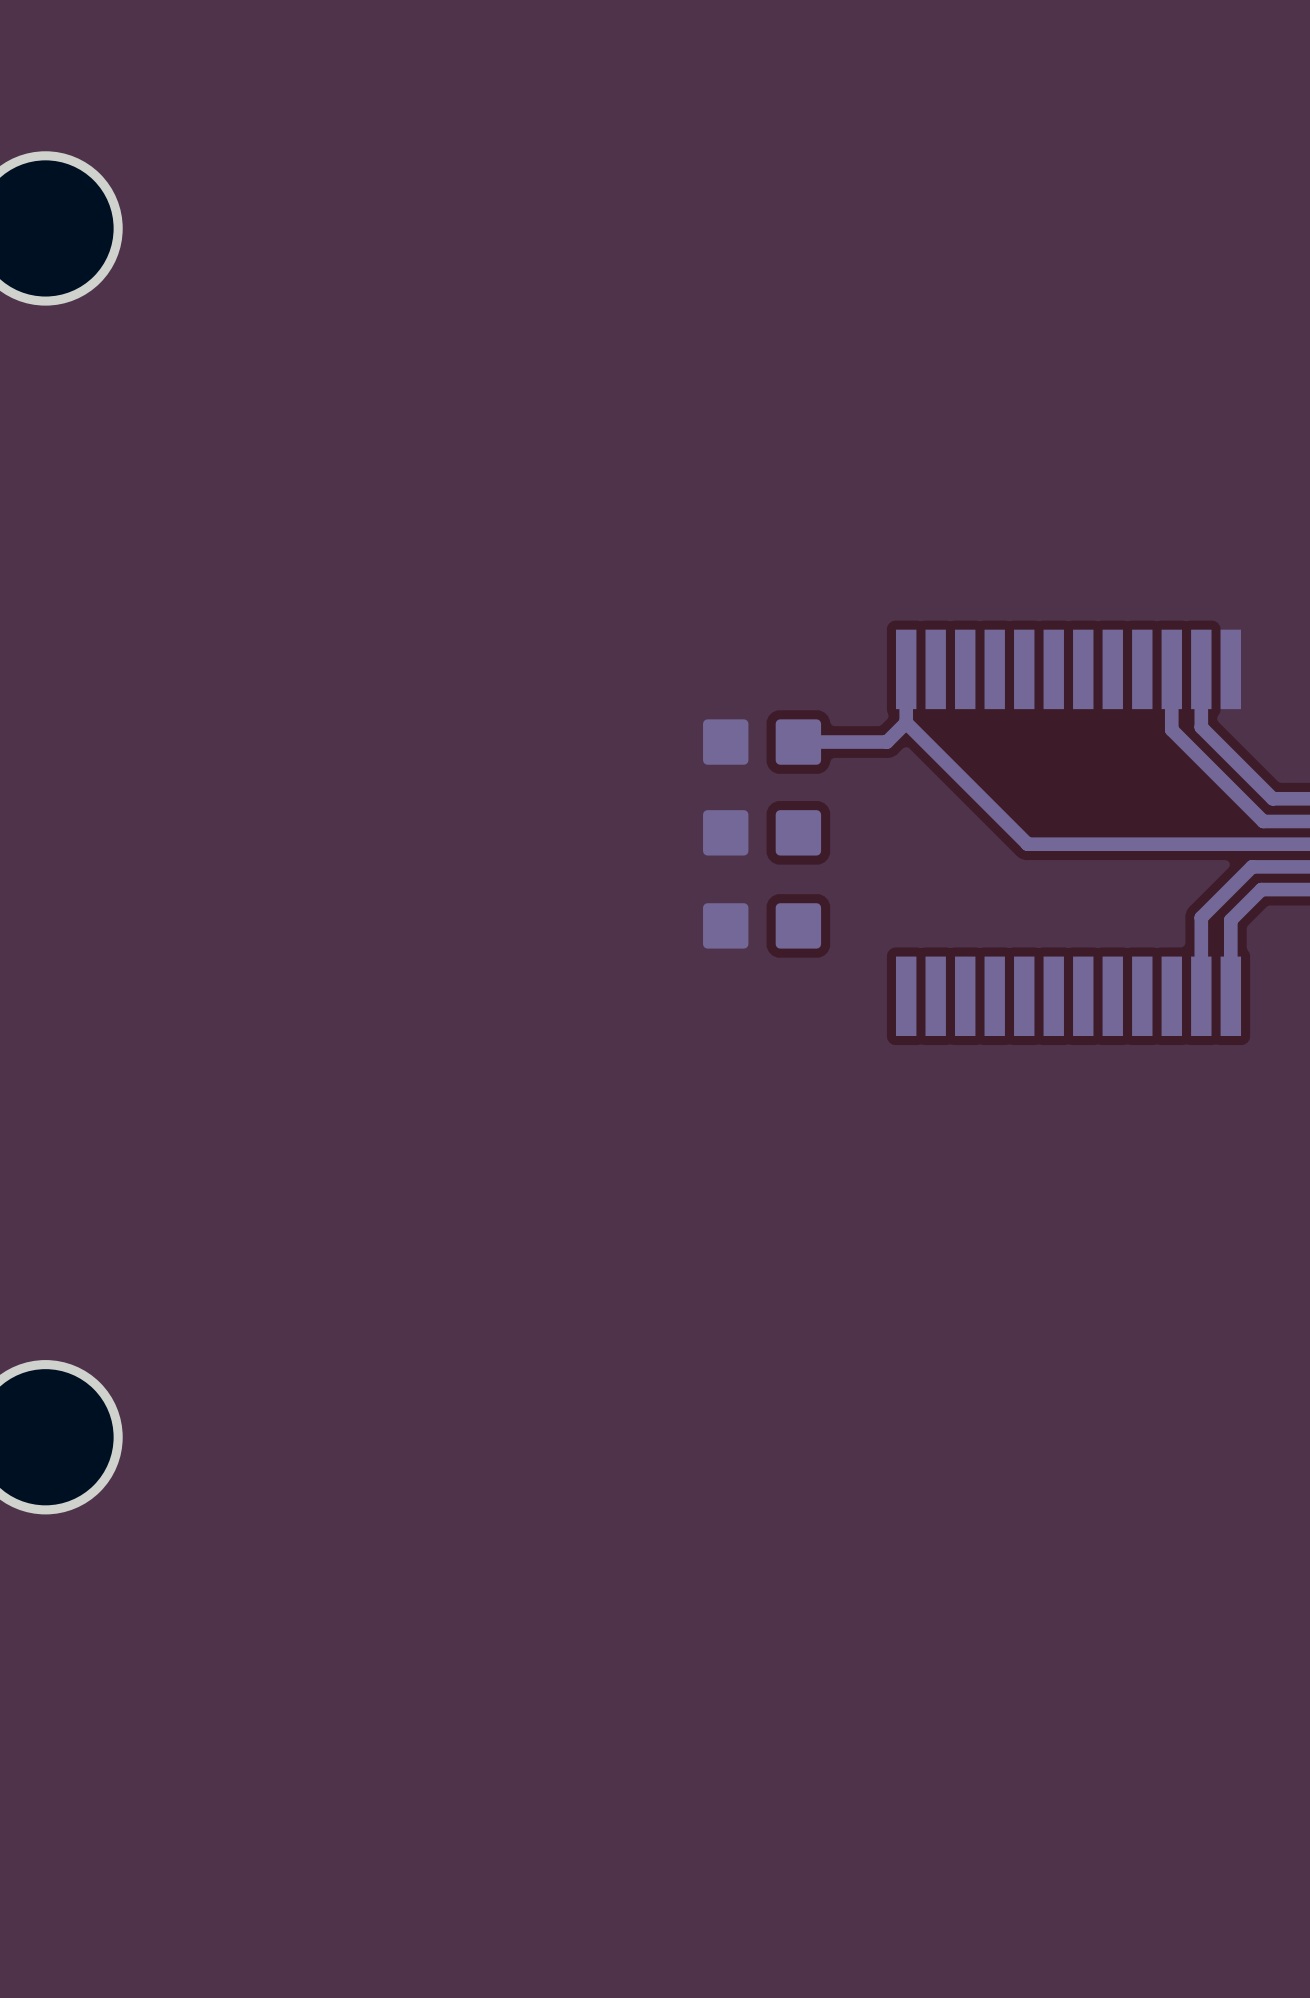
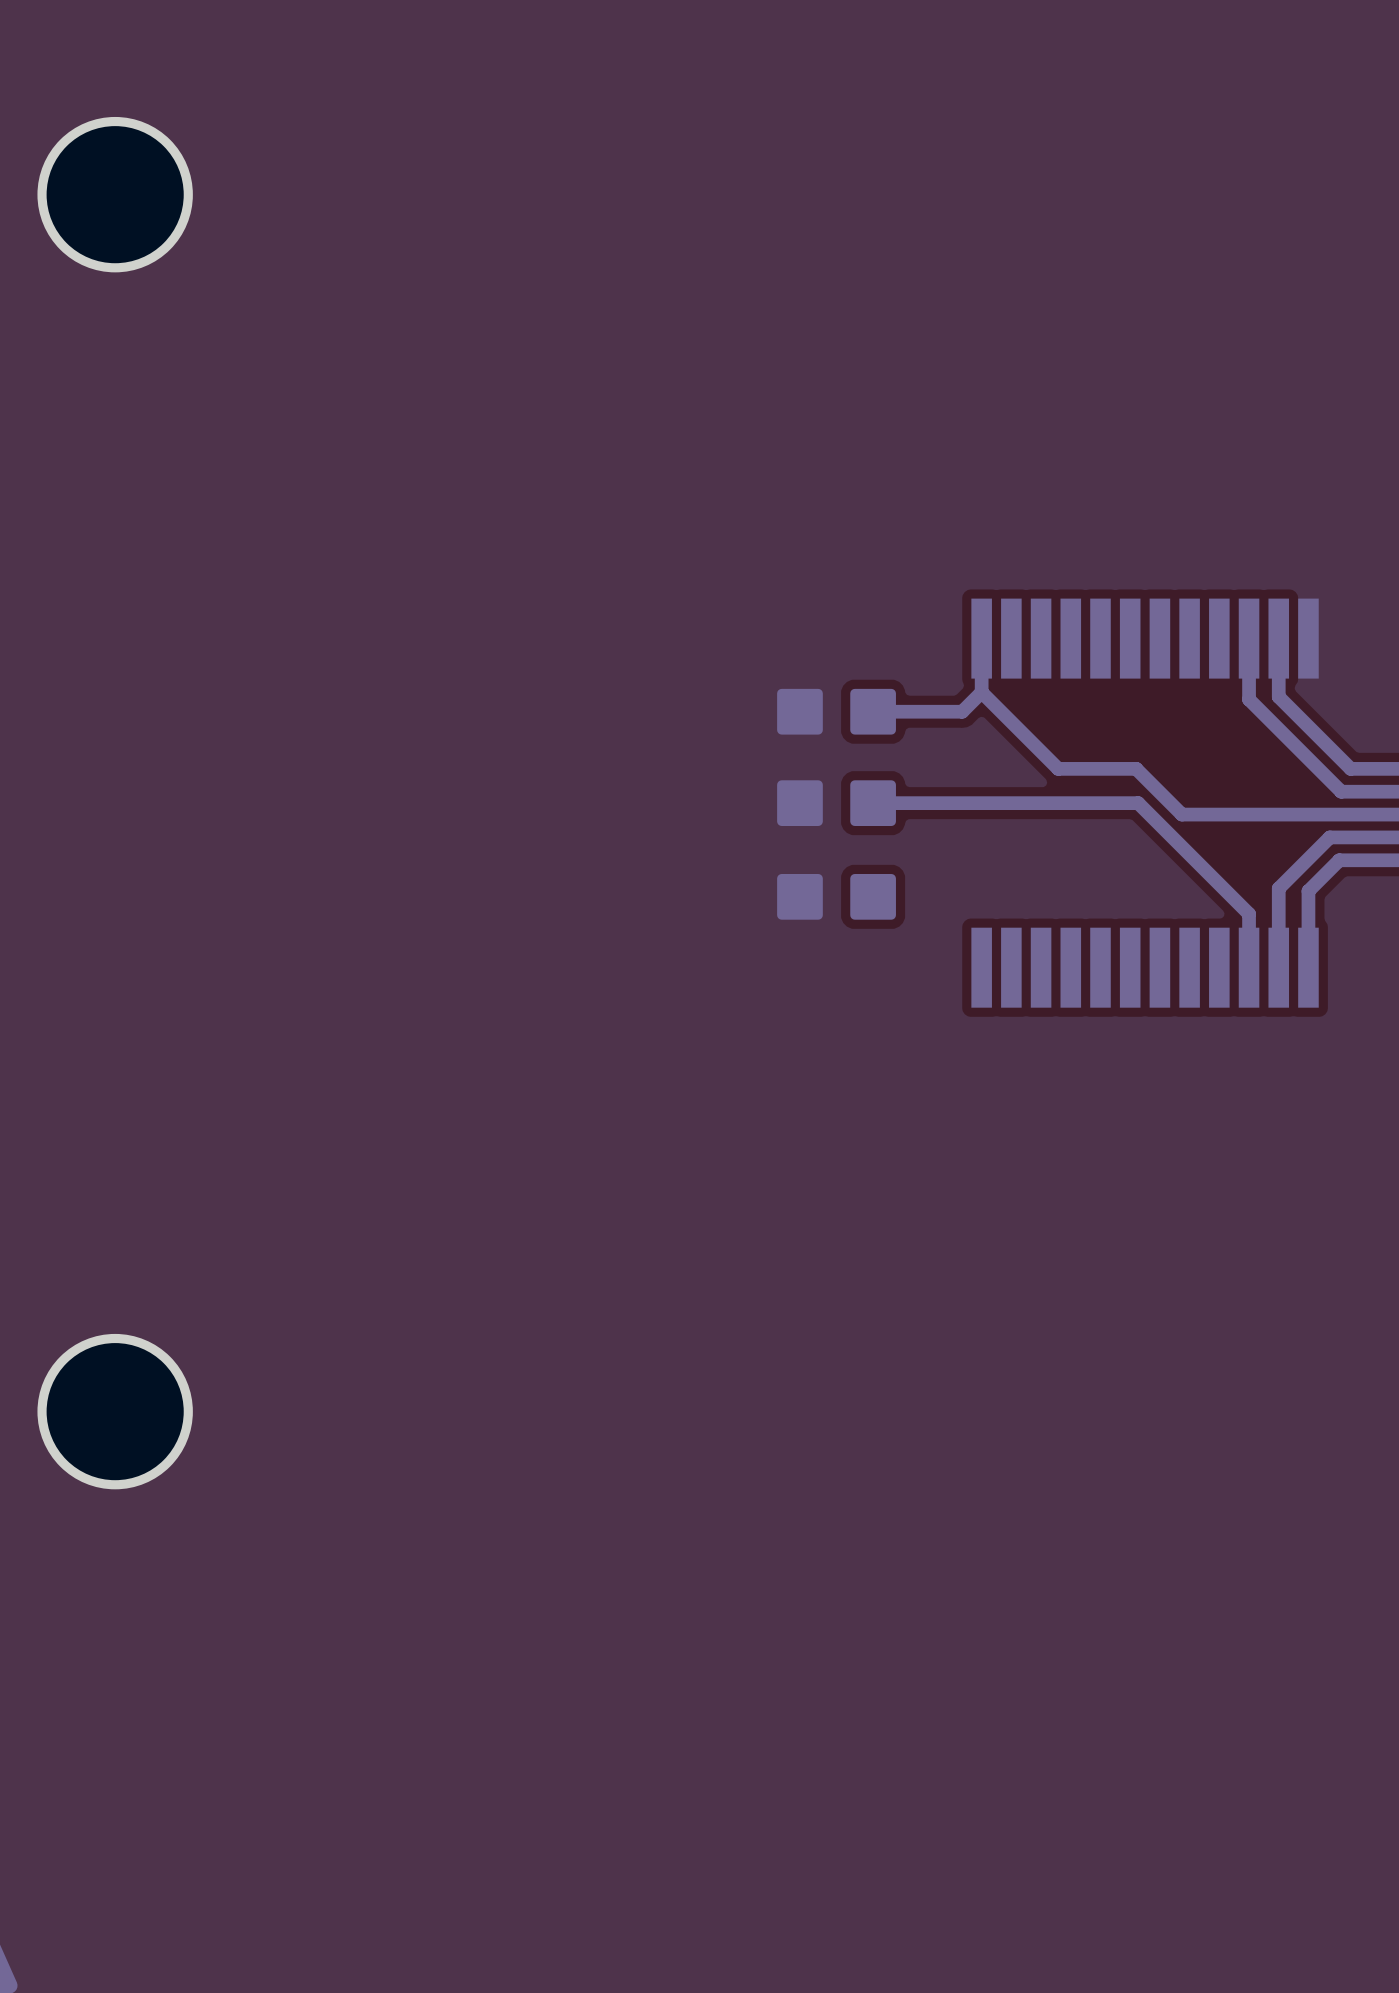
bottom track: (982, 798) (1027, 844) (1105, 844) -> (1058, 768) (1136, 768) (1181, 814)
bottom track: none -> (873, 803) (1138, 803) (1249, 913) (1249, 967)

